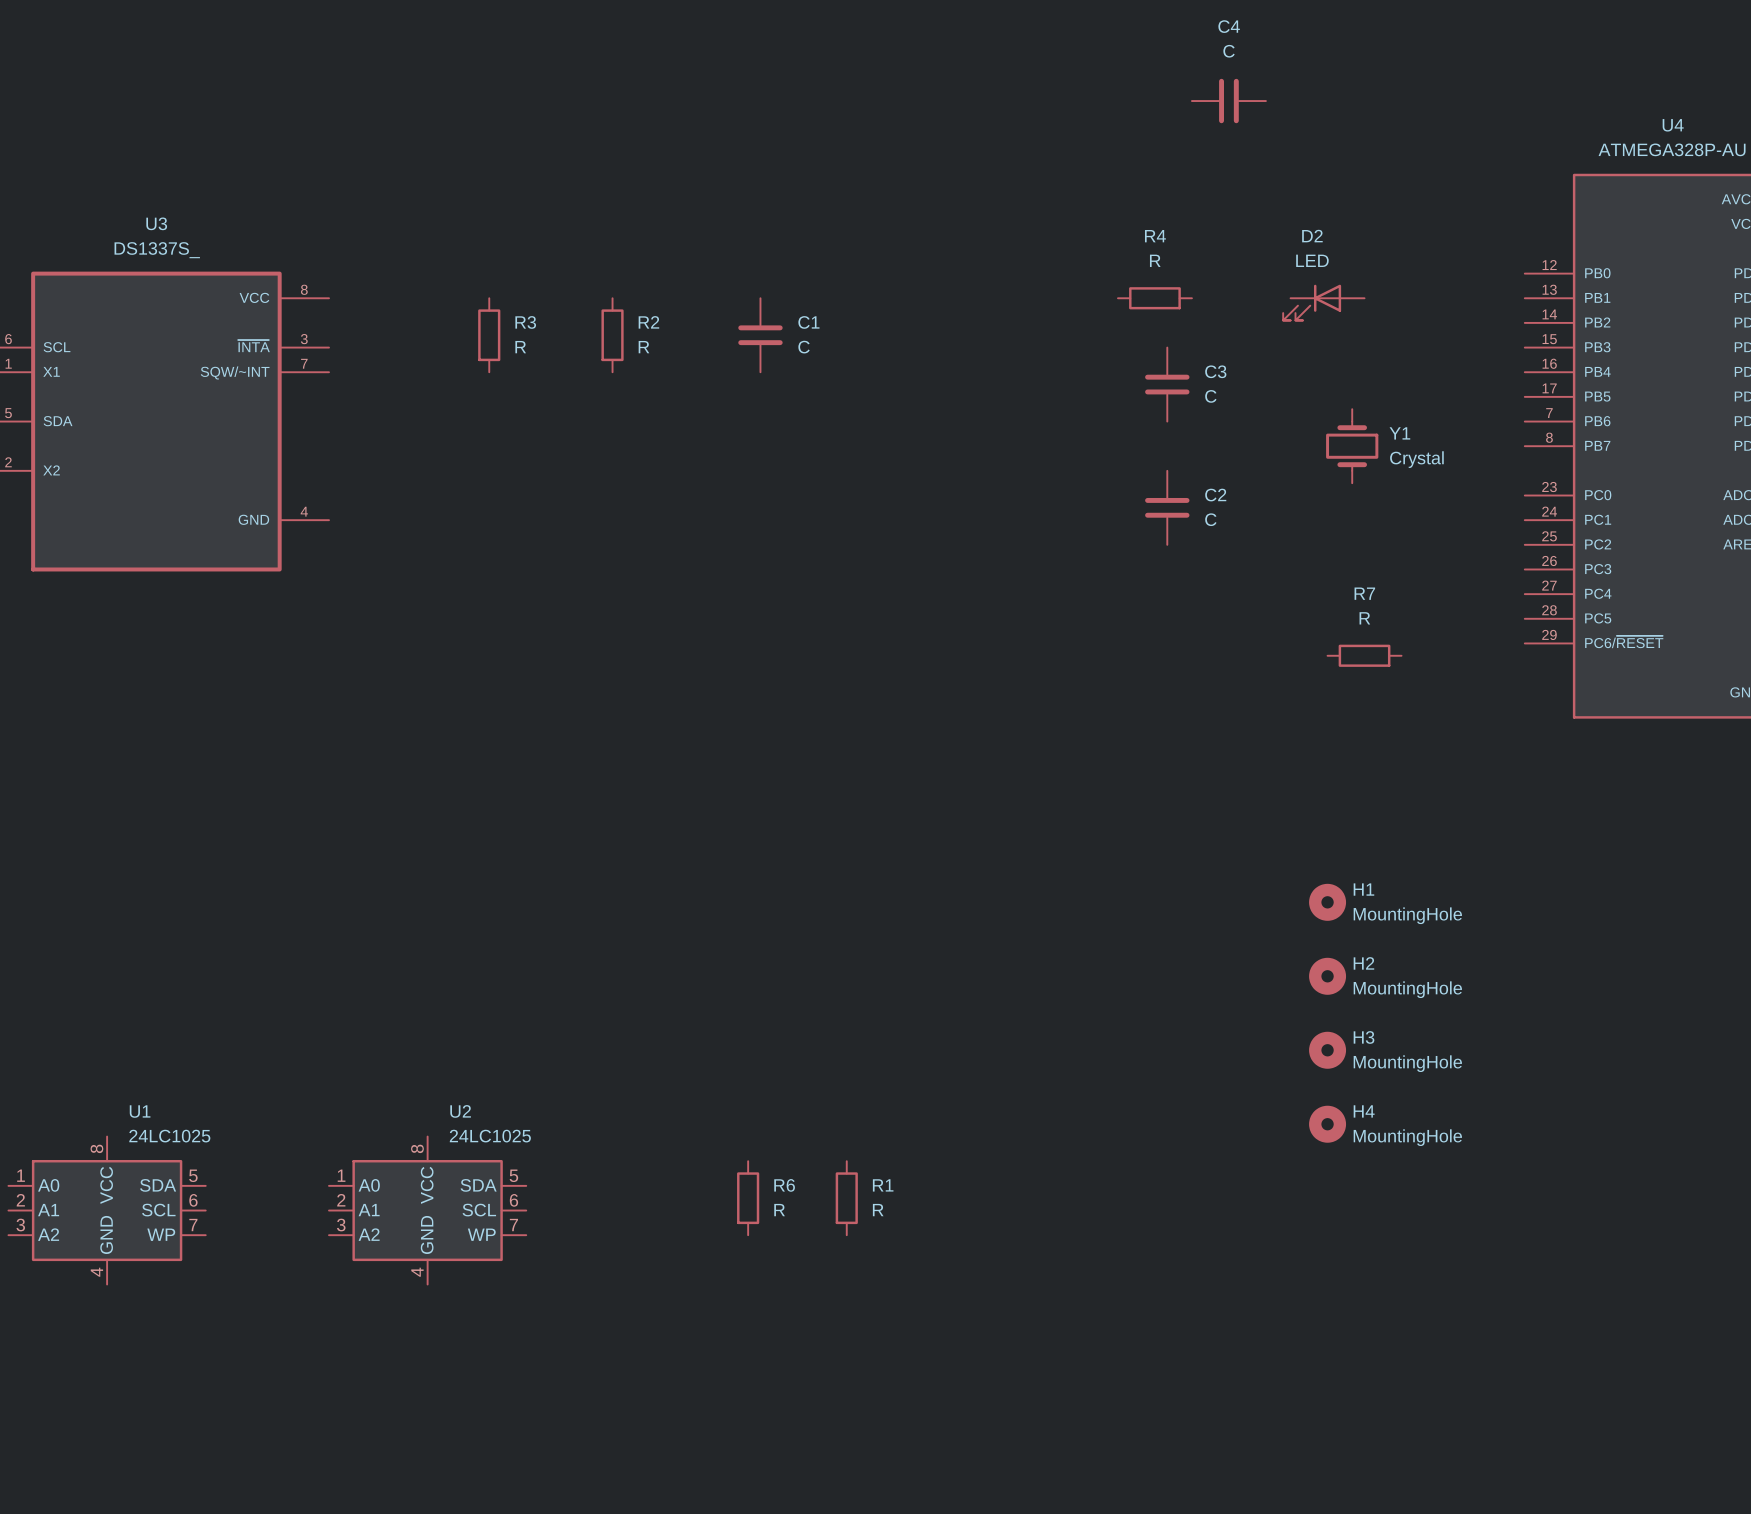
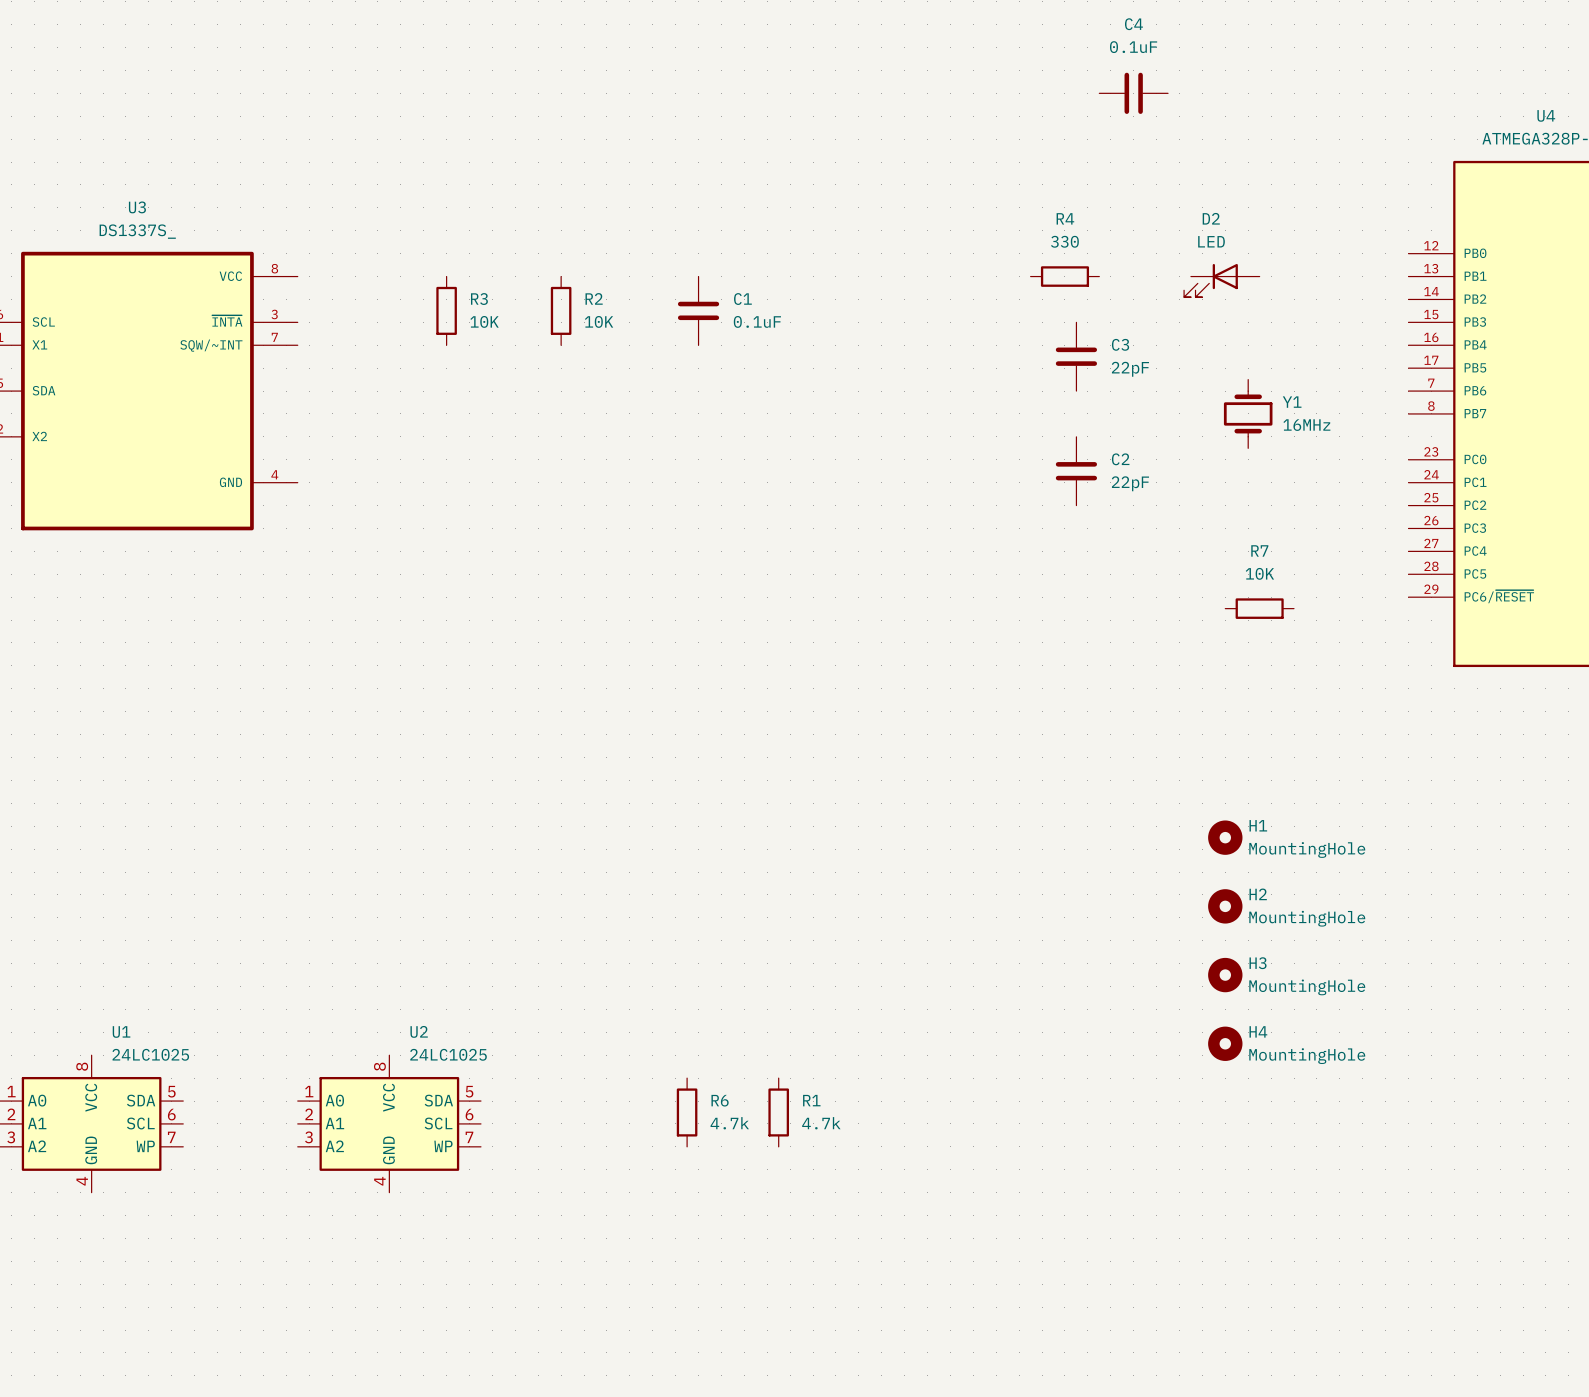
C4 value: C (1229, 51) -> 0.1uF (1133, 47)
R4 value: R (1155, 260) -> 330 (1064, 241)
R3 value: R (520, 347) -> 10K (484, 321)
R2 value: R (643, 347) -> 10K (599, 321)
C1 value: C (804, 347) -> 0.1uF (757, 321)
C3 value: C (1210, 396) -> 22pF (1130, 369)
Y1 value: Crystal (1416, 459) -> 16MHz (1306, 425)
C2 value: C (1210, 519) -> 22pF (1130, 483)
R7 value: R (1364, 618) -> 10K (1259, 573)
R6 value: R (779, 1210) -> 4.7k (729, 1123)
R1 value: R (878, 1210) -> 4.7k (821, 1123)

